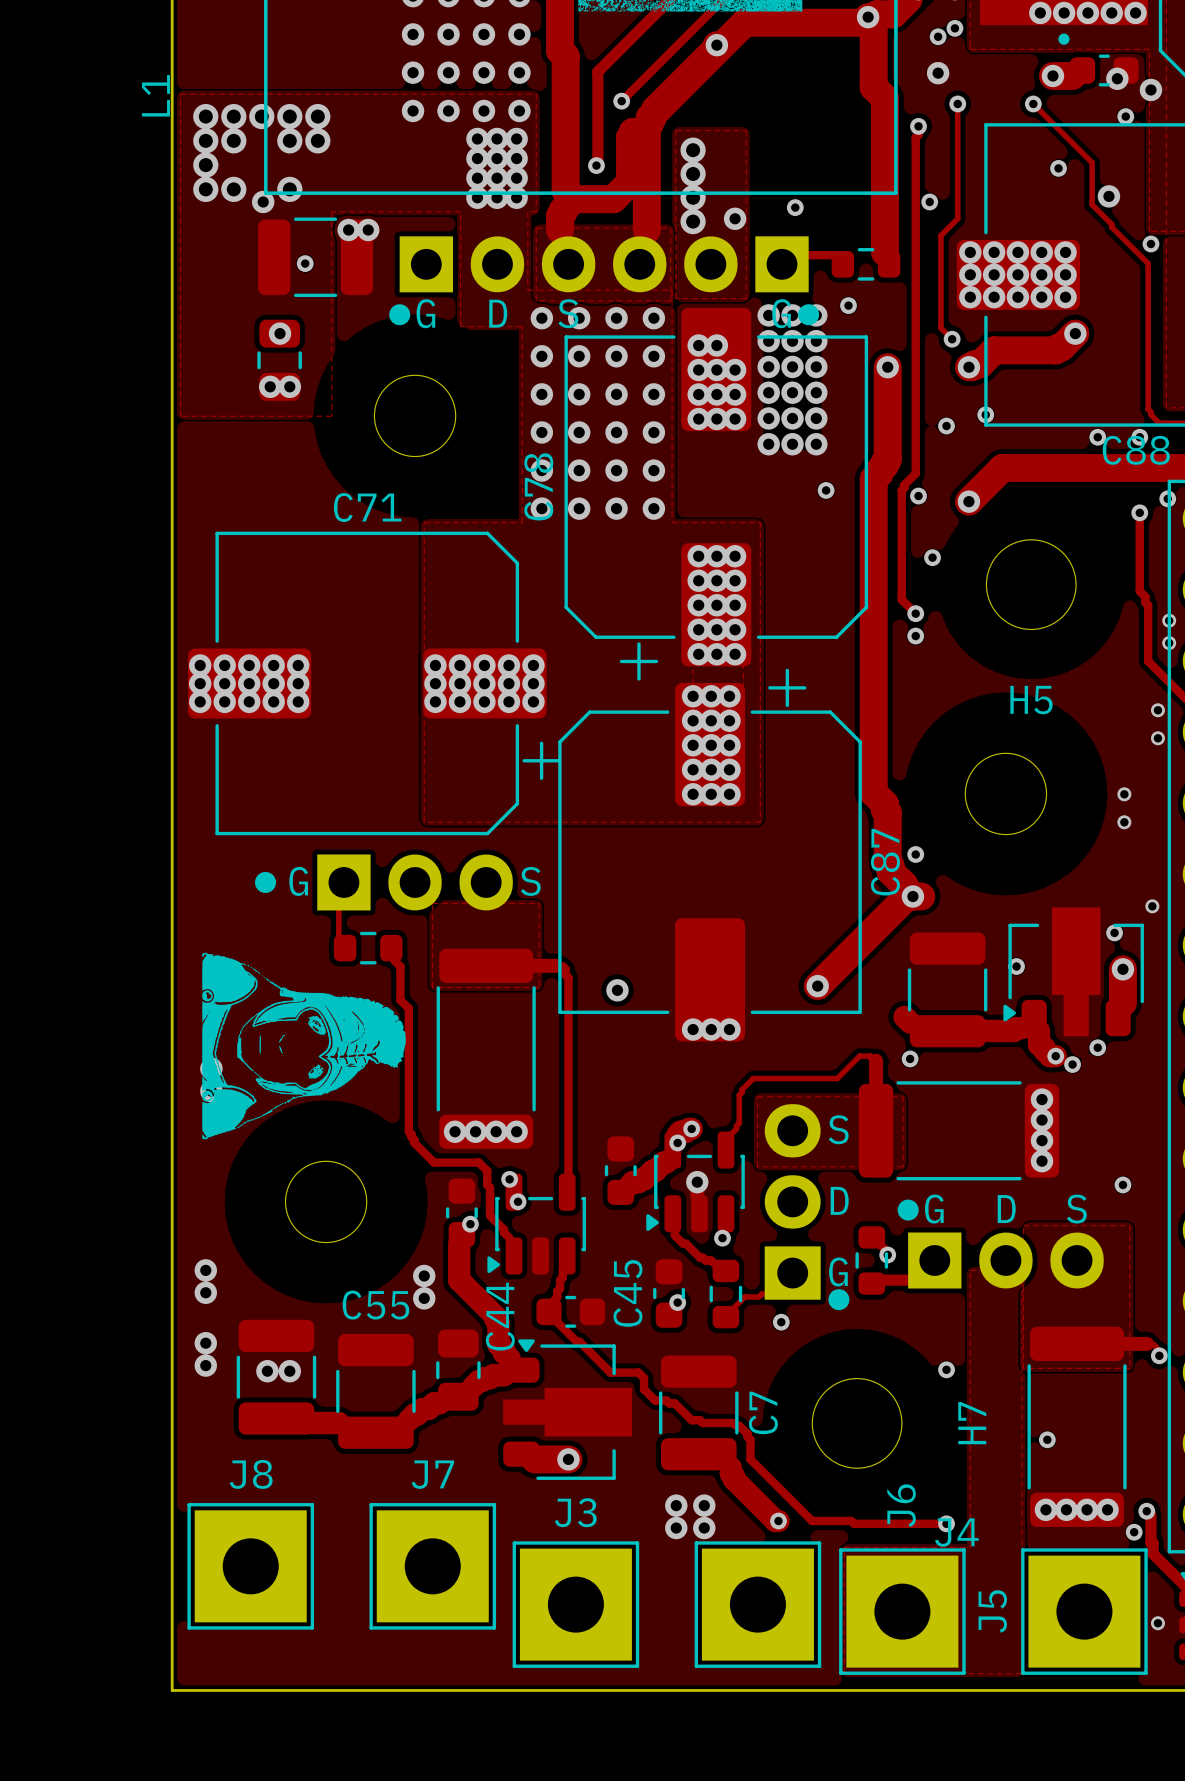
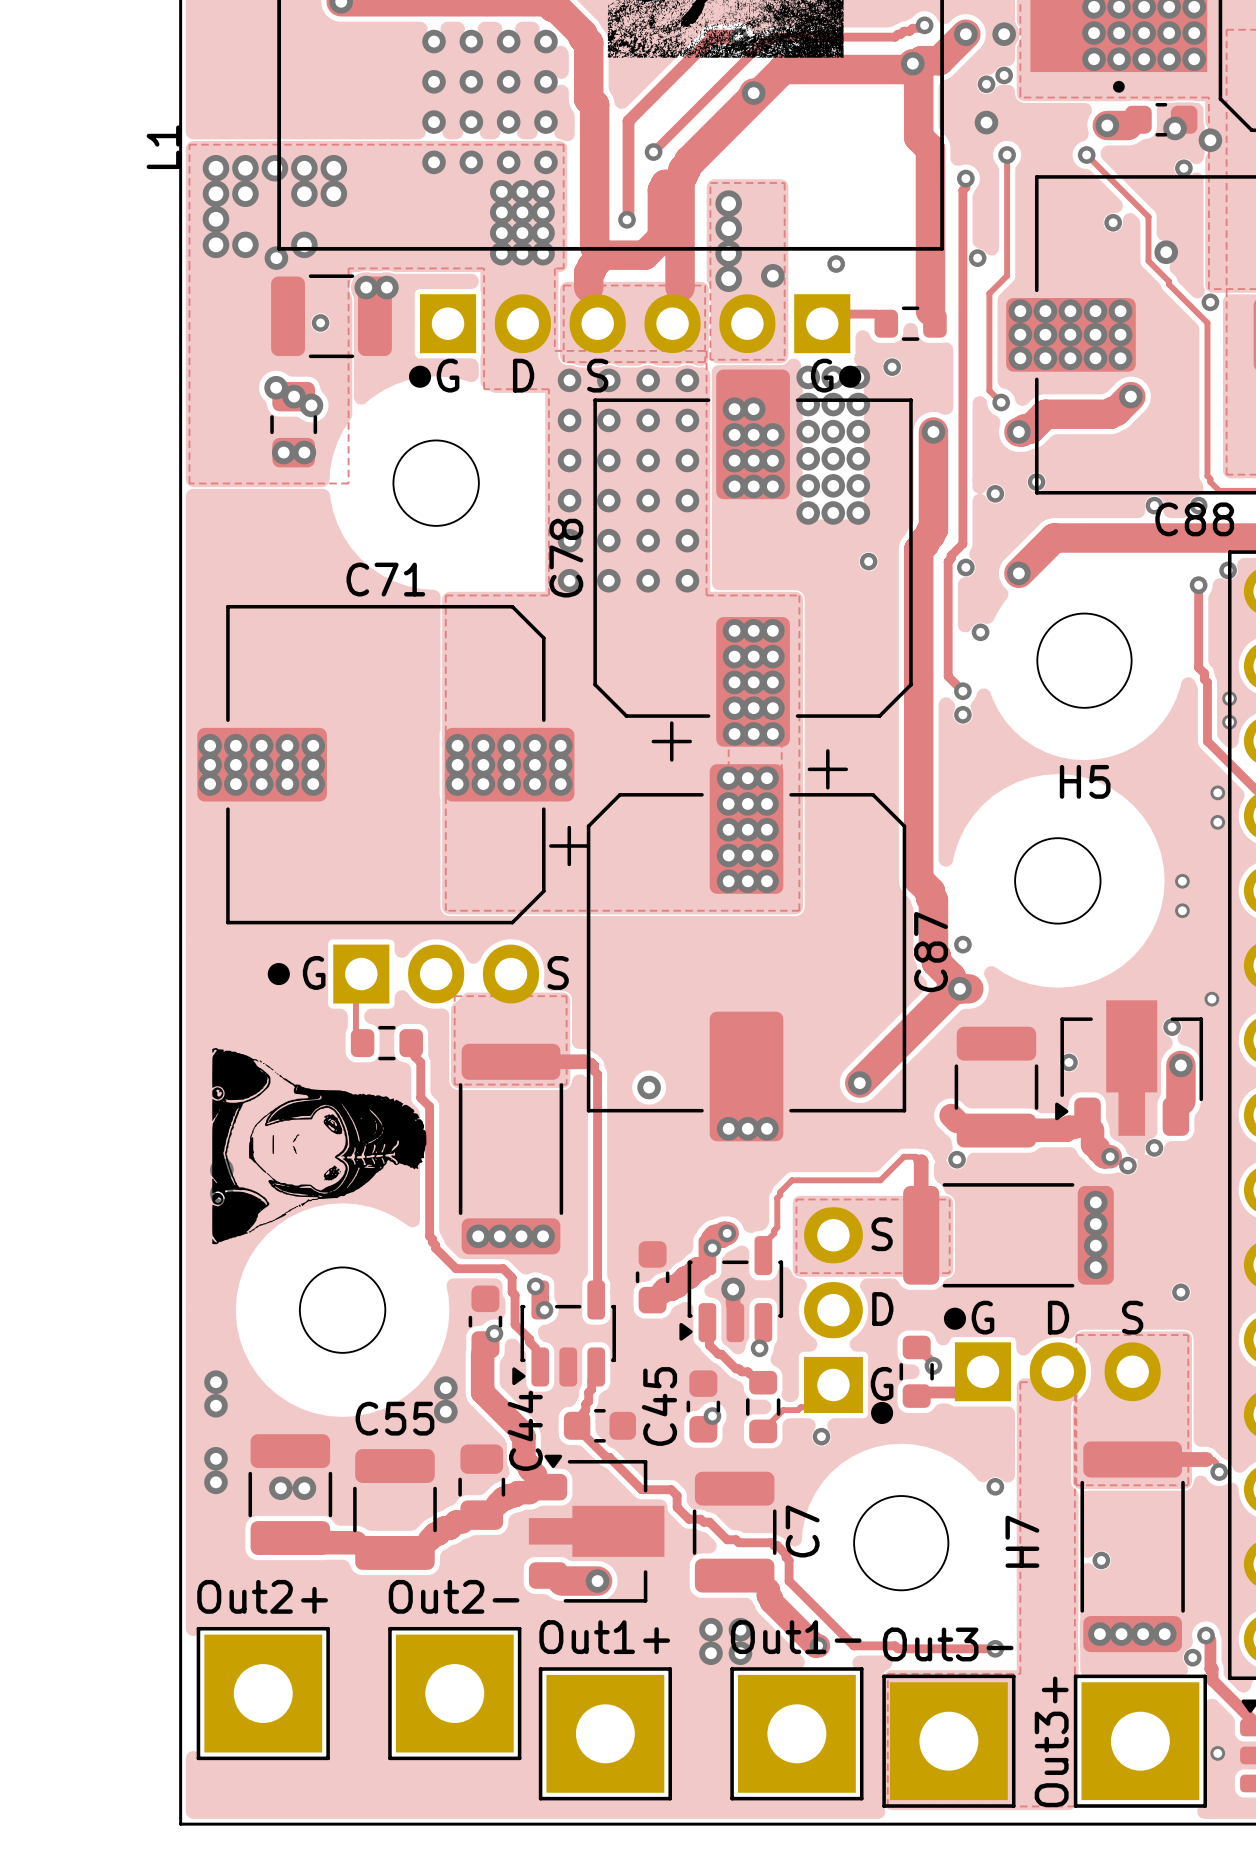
via: none -> (276, 387)
via: none -> (311, 405)
J8 value: none -> Out2+ (262, 1596)
J8 name: J8 (251, 1474) -> none
J7 value: none -> Out2- (454, 1596)
J7 name: J7 (432, 1474) -> none
J6 name: J6 (901, 1505) -> none
J3 name: J3 (575, 1512) -> none
J3 value: none -> Out1+ (604, 1637)
J4 value: none -> Out1- (796, 1637)
J6 value: none -> Out3- (948, 1644)
J4 name: J4 (956, 1532) -> none
J5 name: J5 (992, 1611) -> none
J5 value: none -> Out3+ (1051, 1741)

